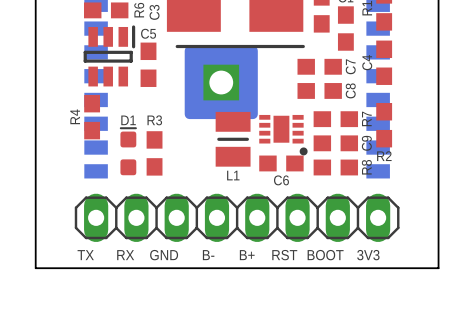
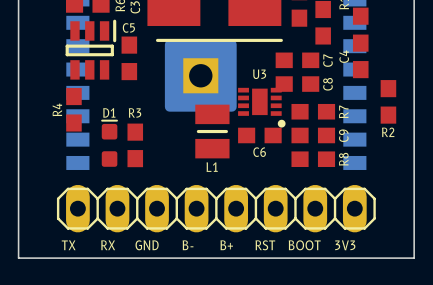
U3: none -> (261, 107)
R2 position: (384, 125) -> (388, 101)
part: (283, 135) -> none
C6 position: (281, 163) -> (259, 135)

